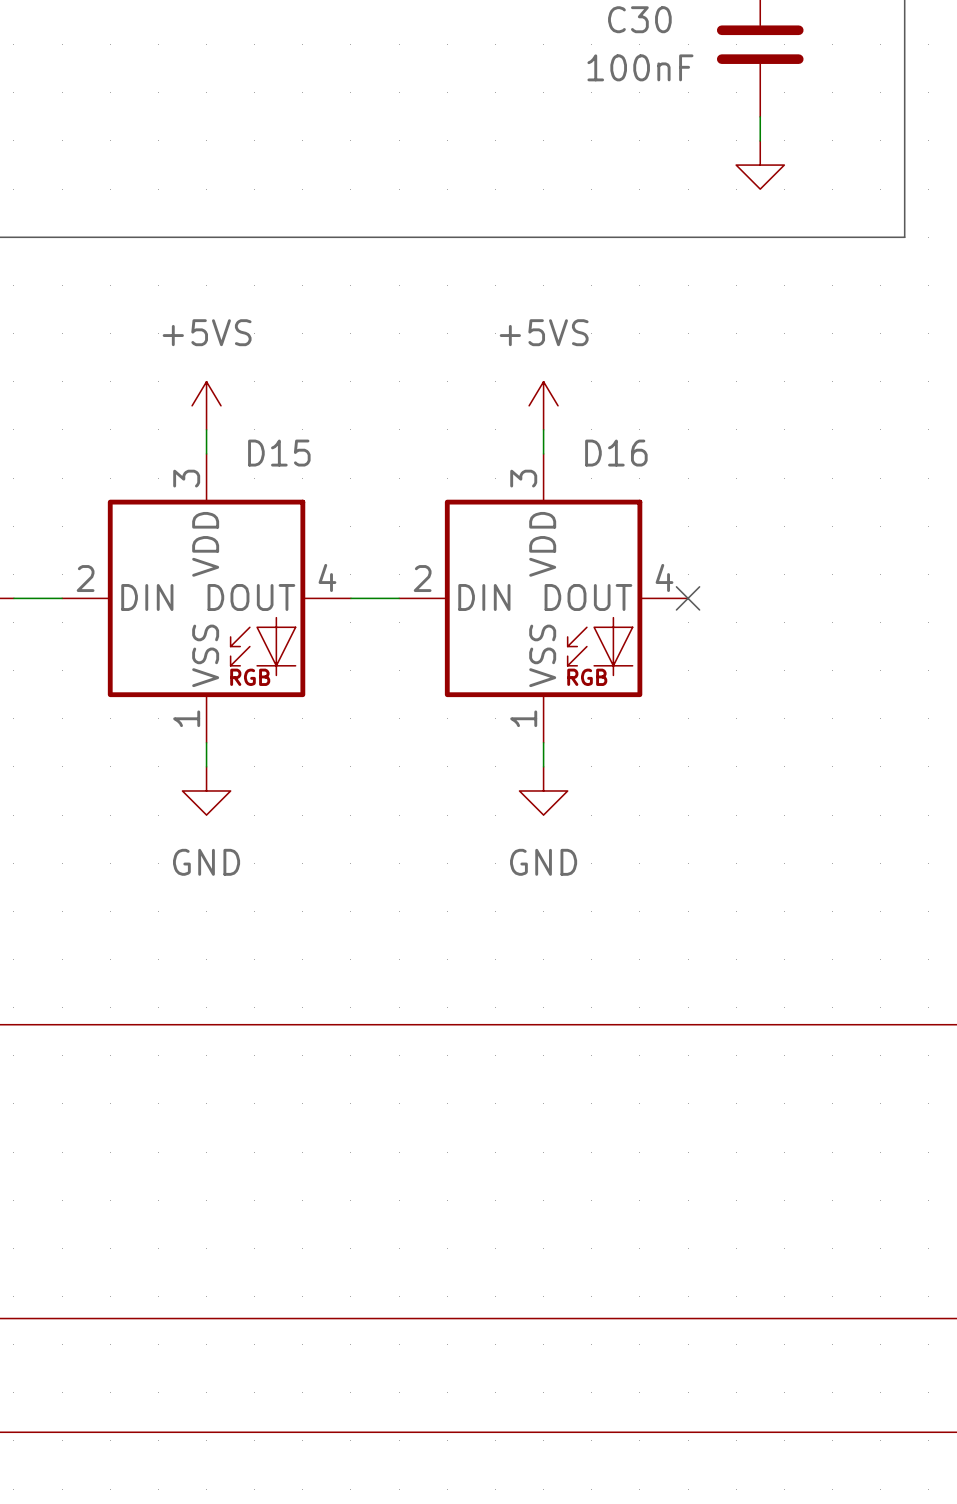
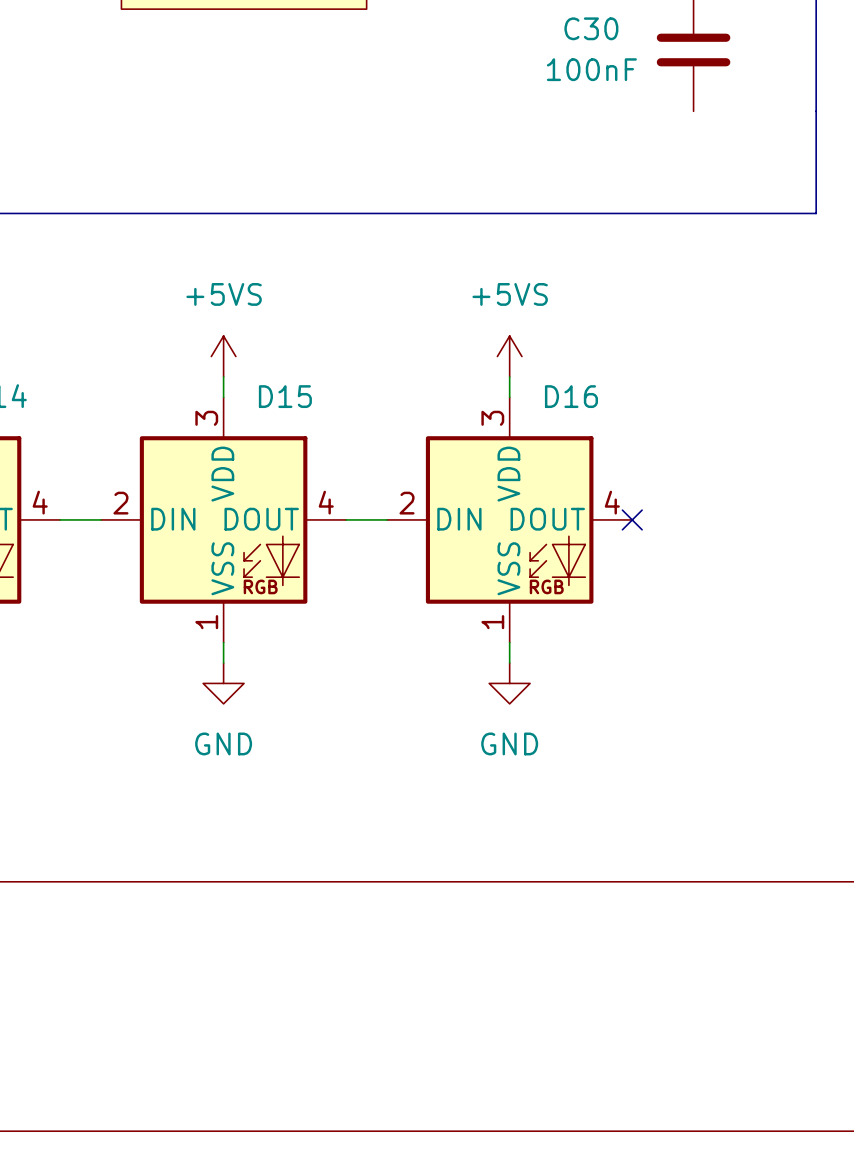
wire: (760, 116) (760, 140) -> none
power symbol: (760, 165) -> none

